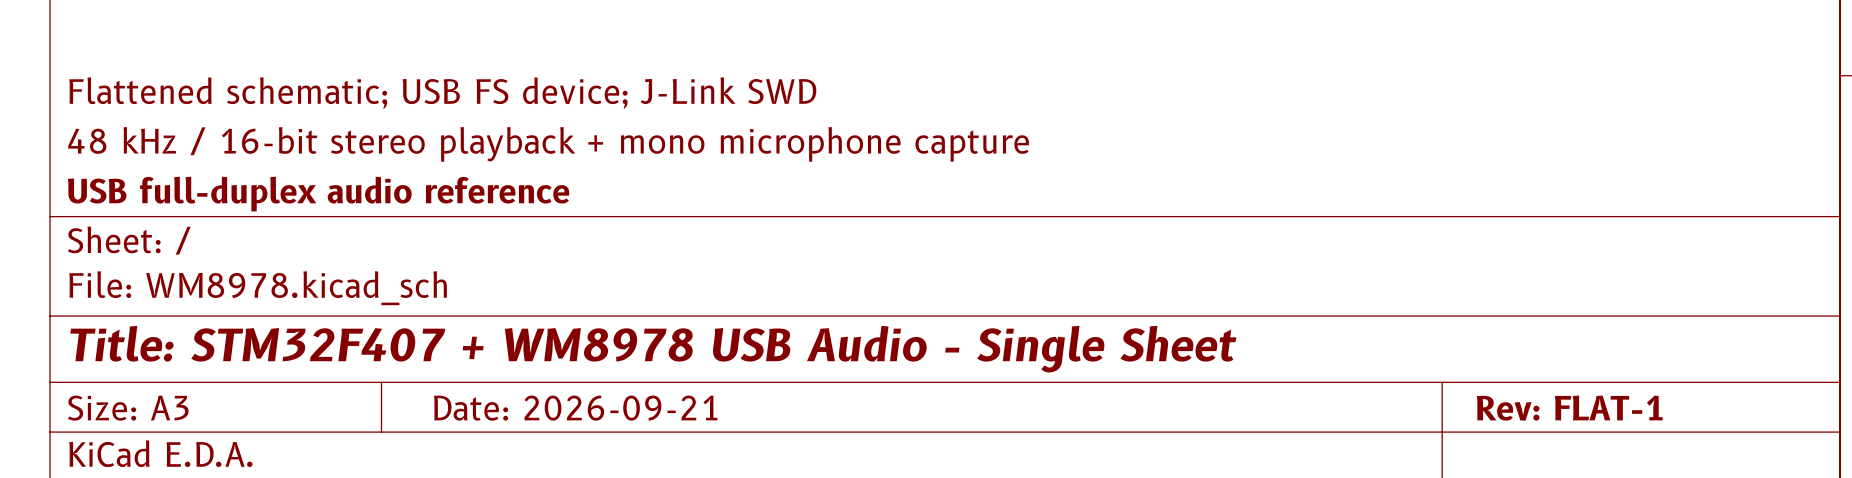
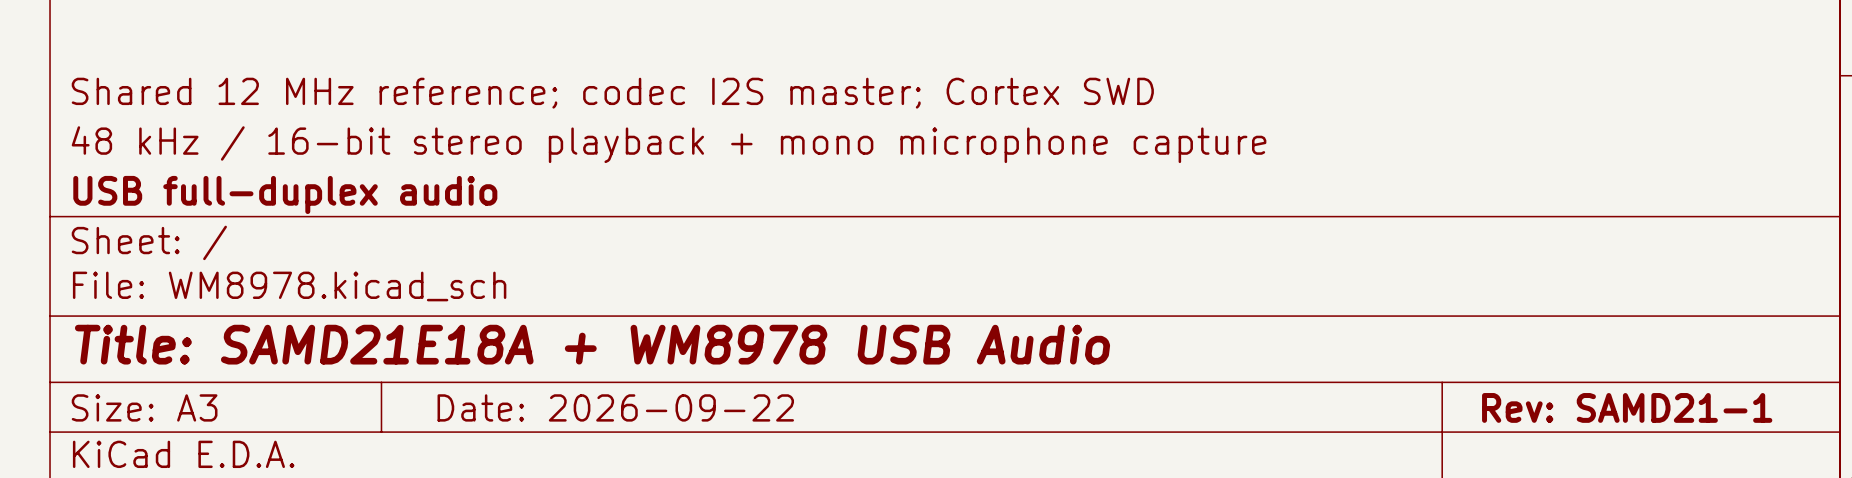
title block: Flattened schematic; USB FS device; J-Link SWD (442, 93) -> Shared 12 MHz reference; codec I2S master; Cortex SWD (612, 93)
title block: USB full-duplex audio reference (318, 194) -> USB full-duplex audio (285, 194)
title block: Title: STM32F407 + WM8978 USB Audio - Single Sheet (653, 349) -> Title: SAMD21E18A + WM8978 USB Audio (592, 344)
title block: Date: 2026-09-21 (575, 408) -> Date: 2026-09-22 (615, 407)
title block: Rev: FLAT-1 (1569, 408) -> Rev: SAMD21-1 (1627, 407)

